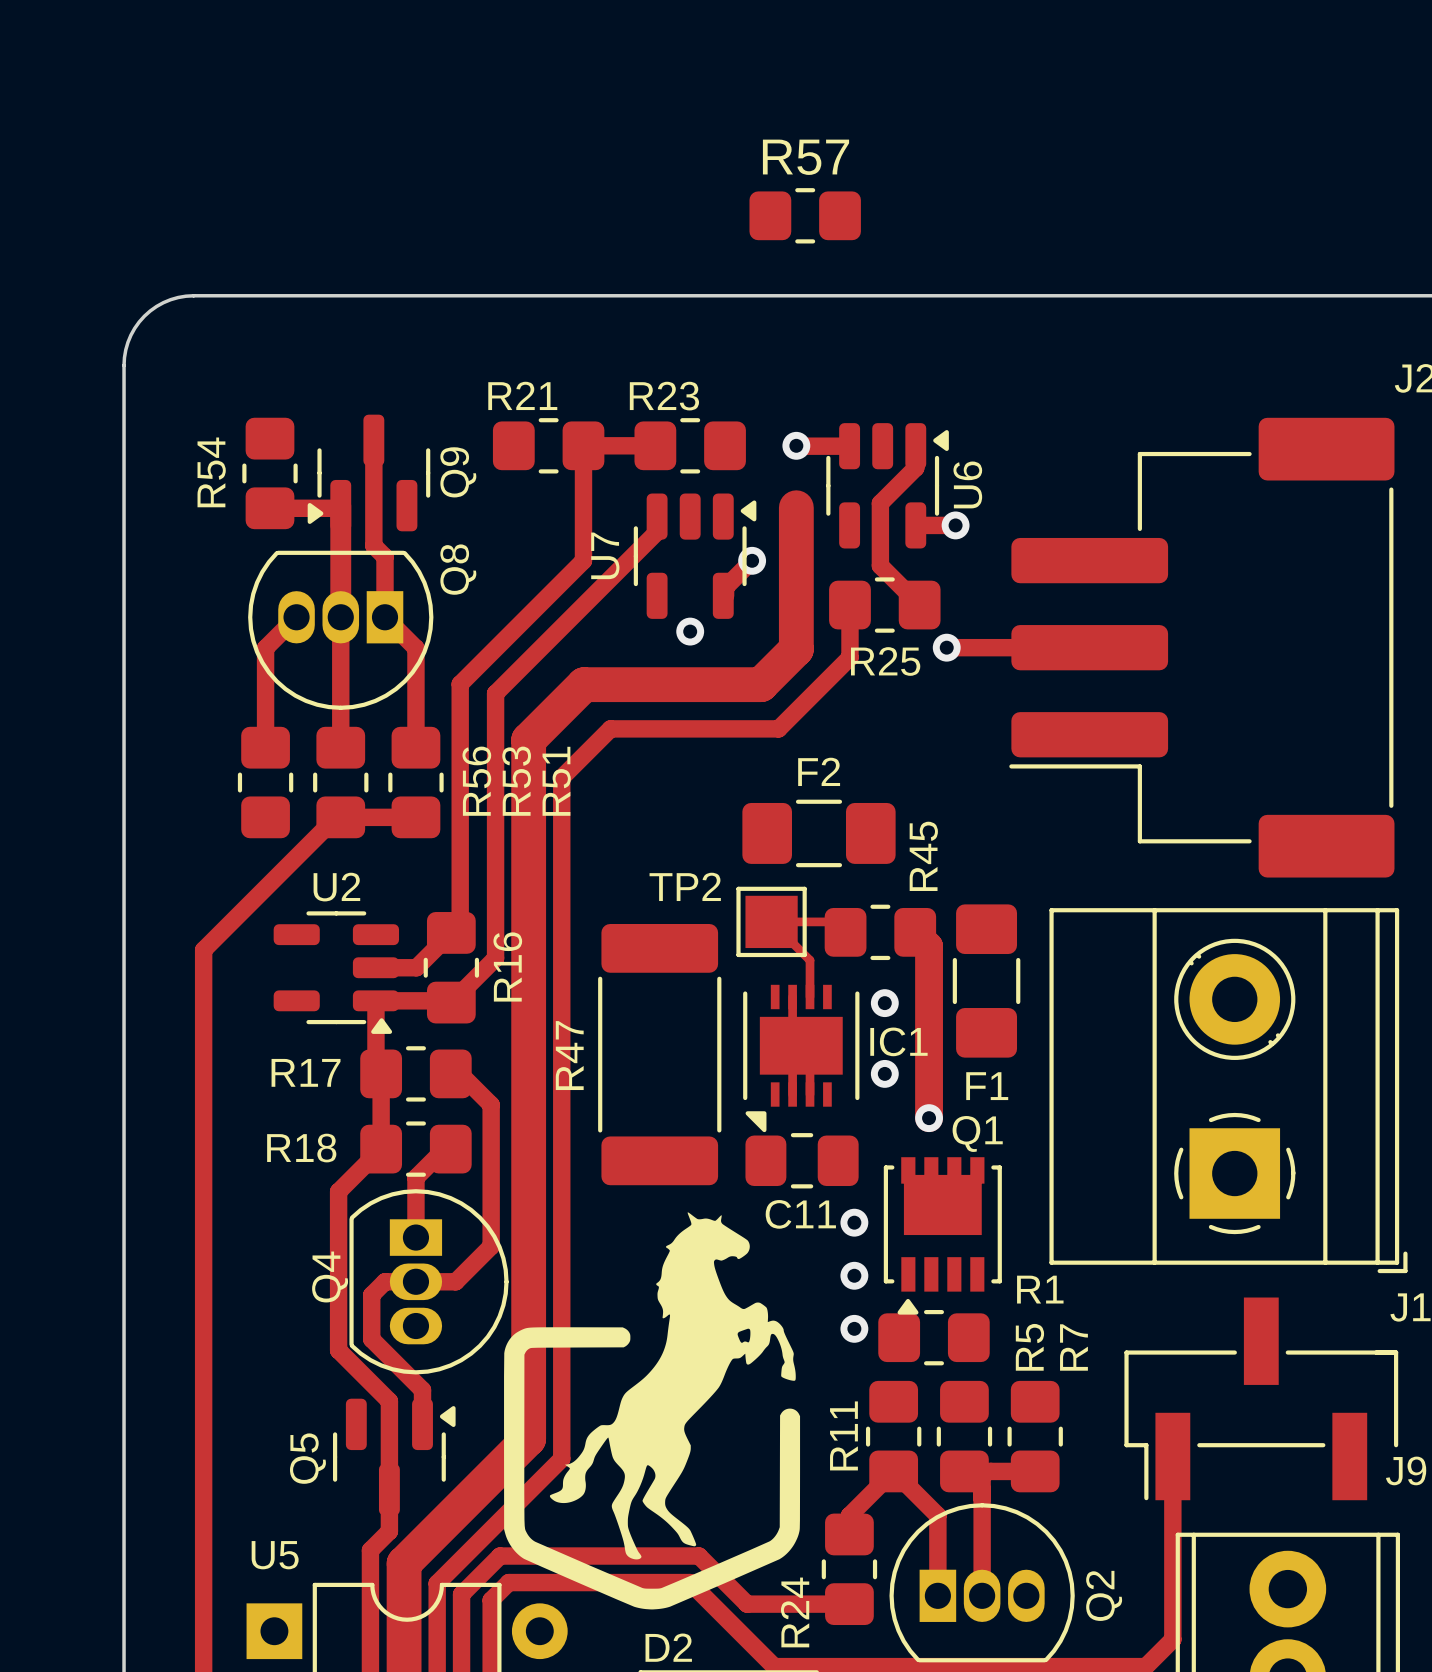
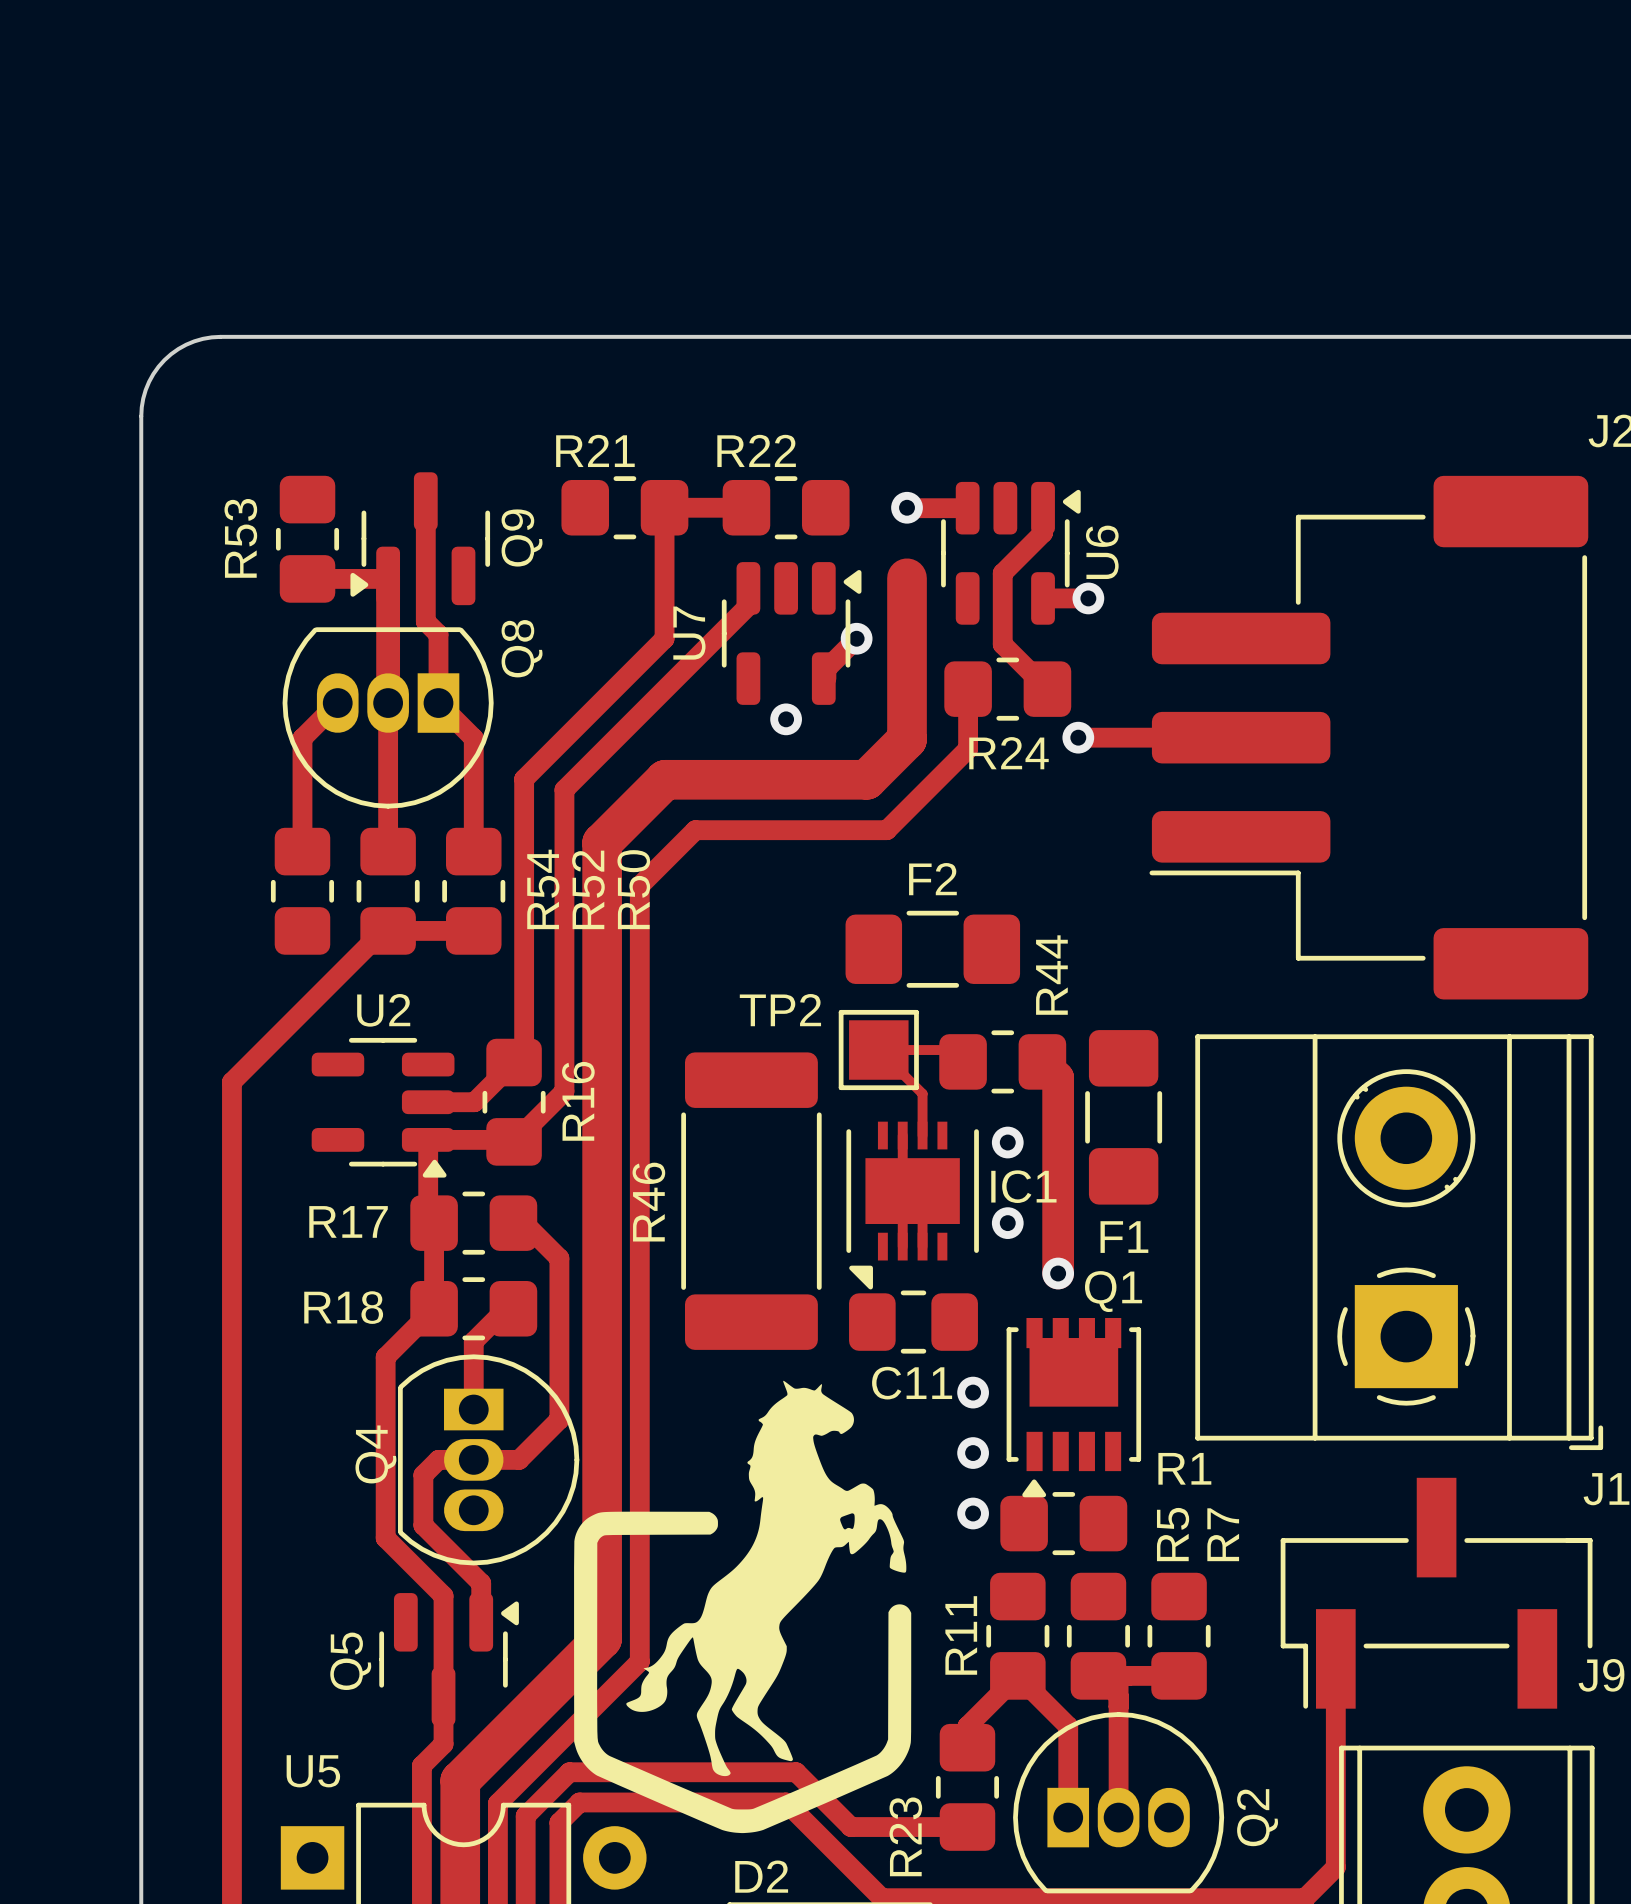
R57: (805, 215) -> none
R23 name: R23 (664, 396) -> R22 (756, 450)
R54 name: R54 (211, 472) -> R53 (240, 538)
R25 name: R25 (885, 661) -> R24 (1008, 753)
R56 name: R56 (476, 781) -> R54 (543, 889)
R53 name: R53 (516, 781) -> R52 (588, 889)
R51 name: R51 (556, 781) -> R50 (633, 889)
R45 name: R45 (923, 856) -> R44 (1051, 975)
R47 name: R47 (569, 1055) -> R46 (648, 1202)
R24 name: R24 (795, 1612) -> R23 (905, 1836)

